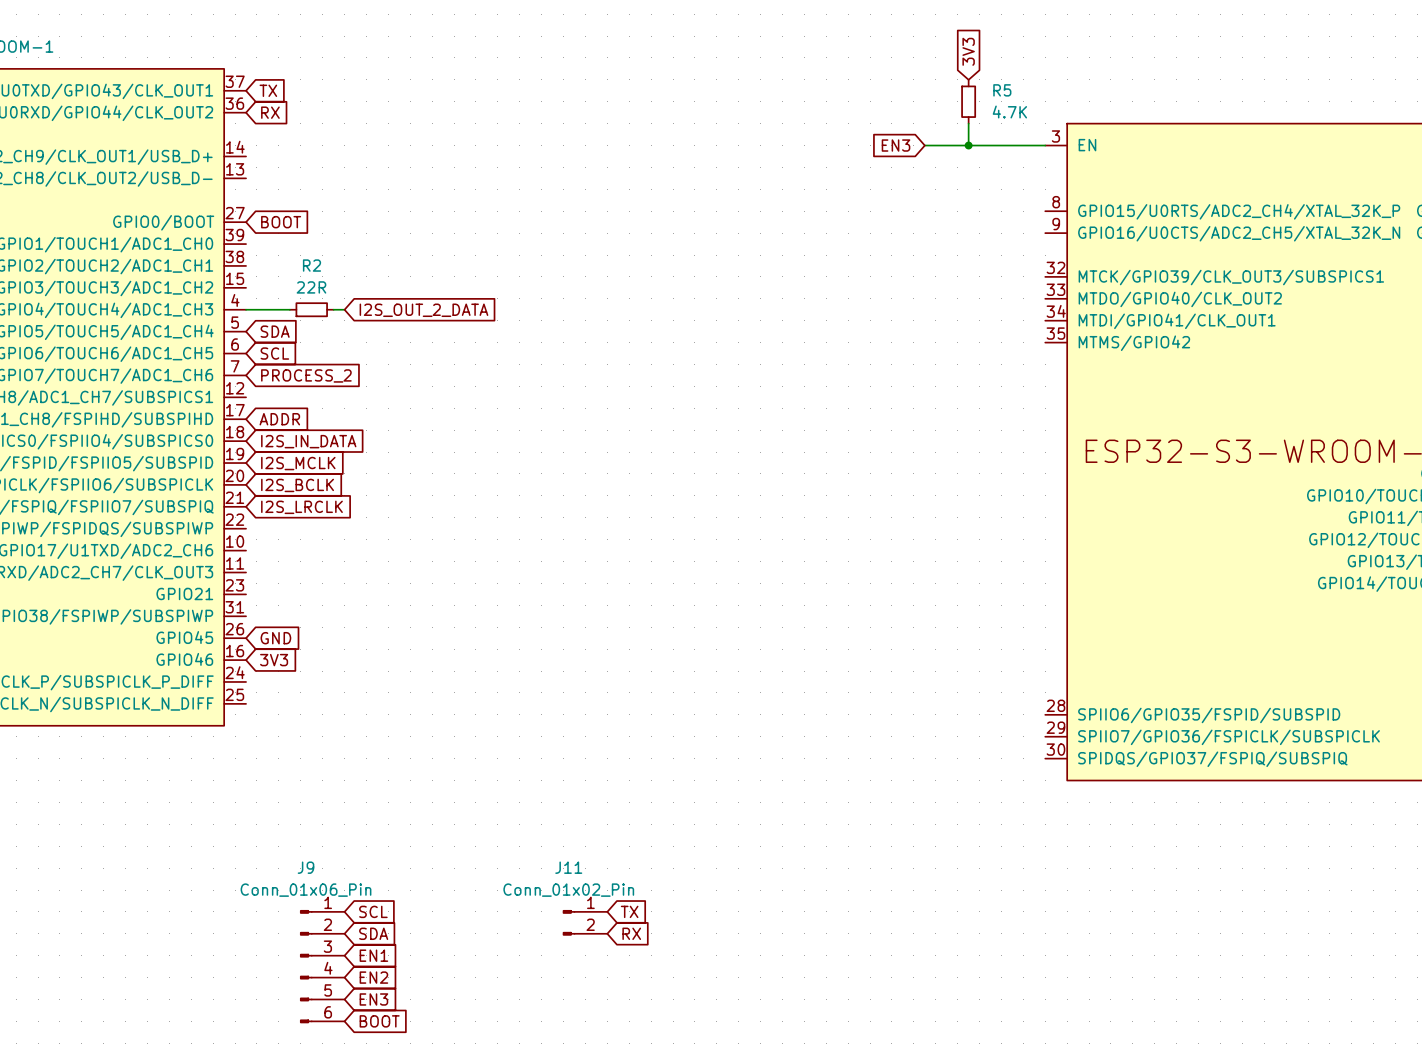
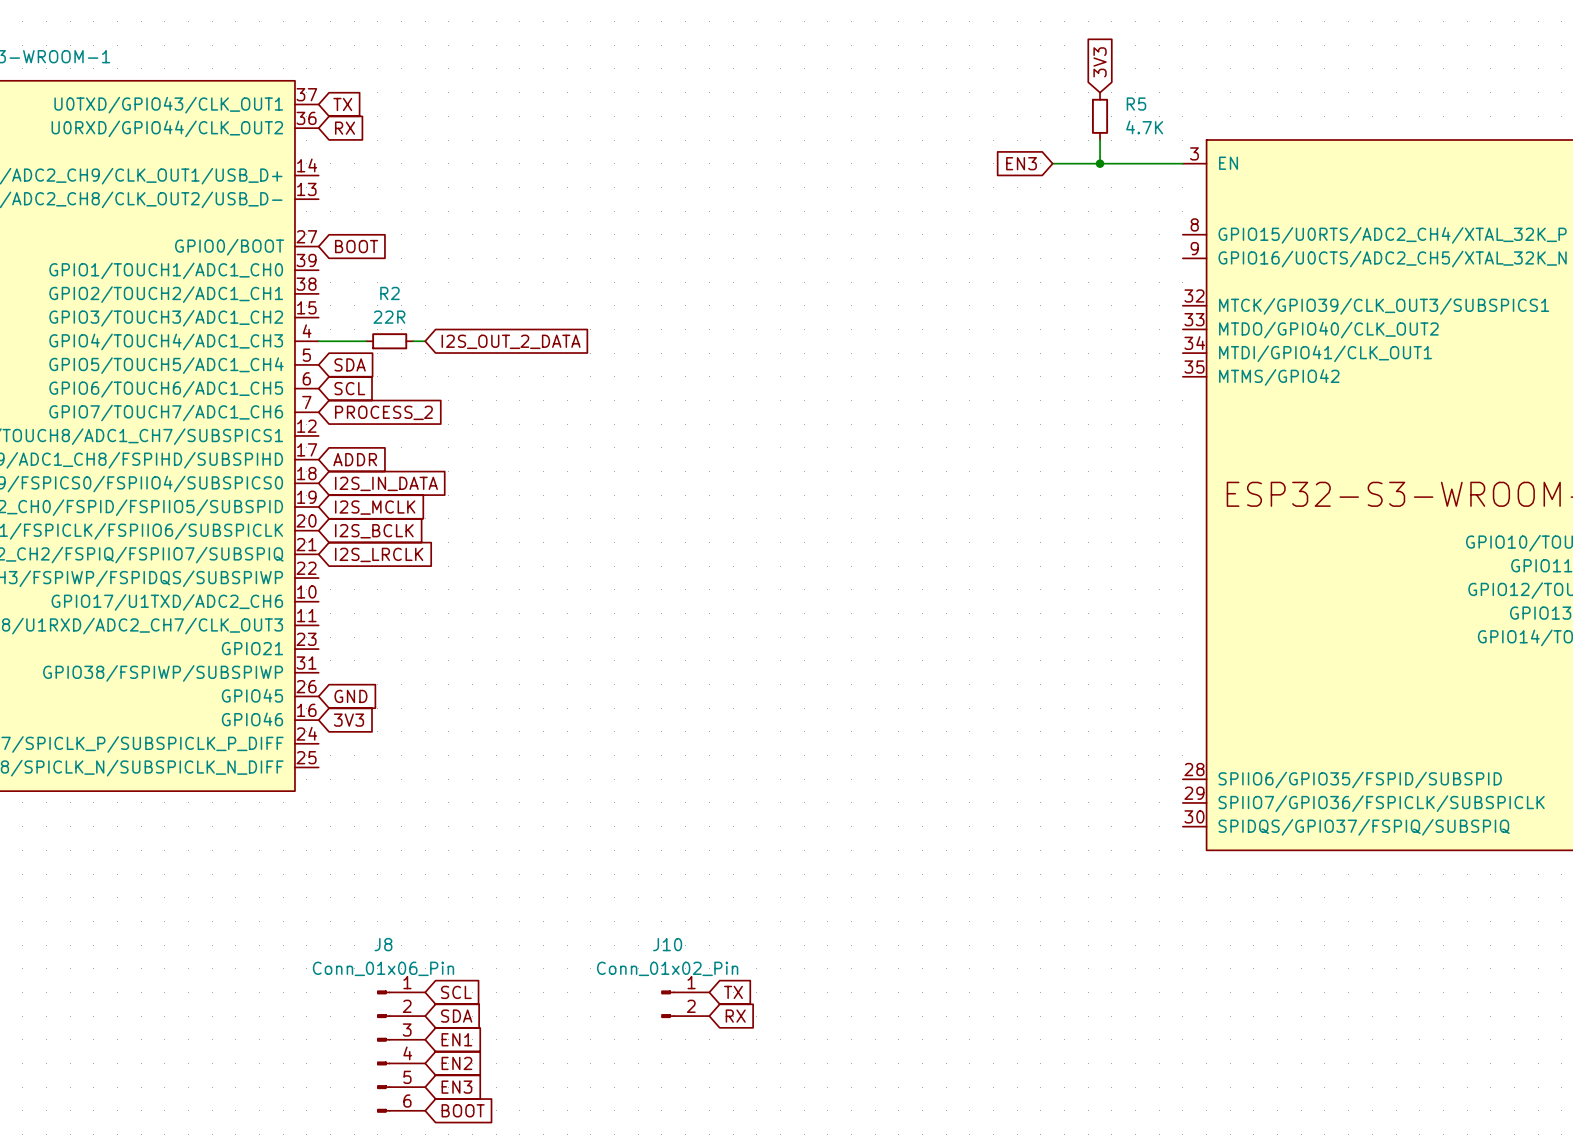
J9 name: J9 (306, 867) -> J8 (383, 944)
J11 name: J11 (568, 867) -> J10 (667, 944)

